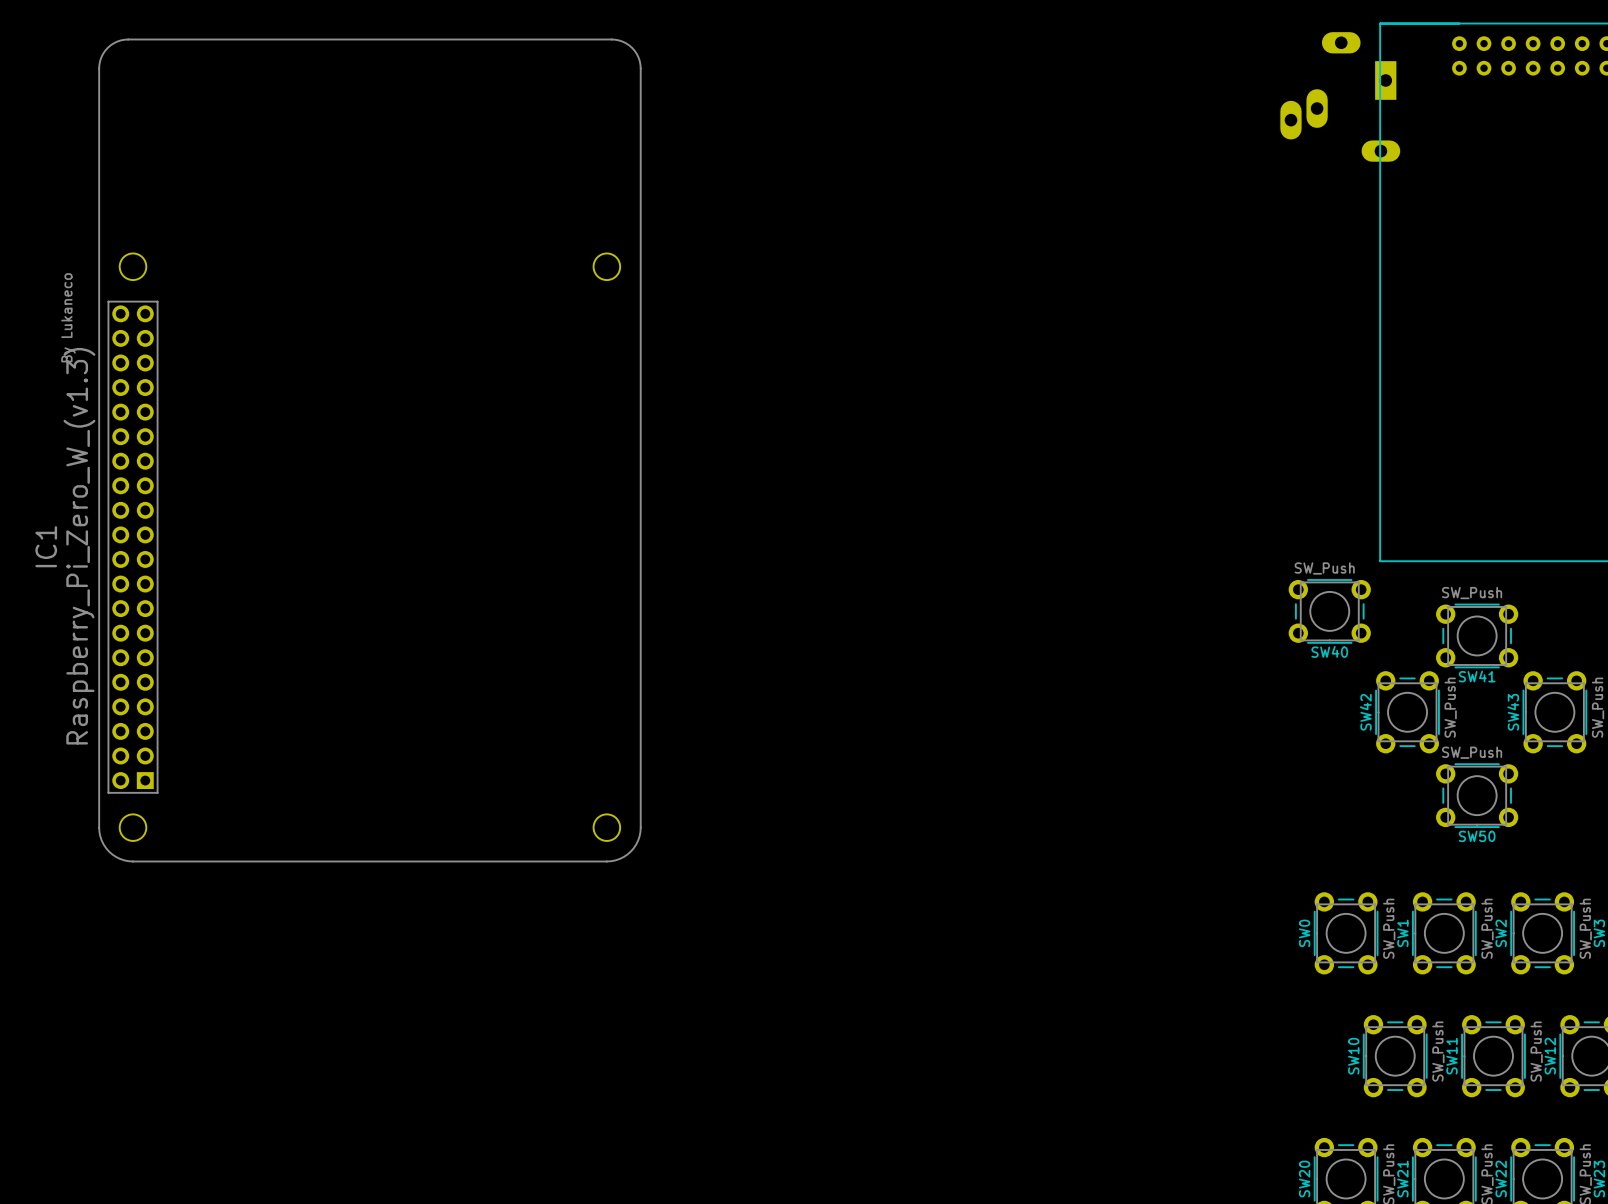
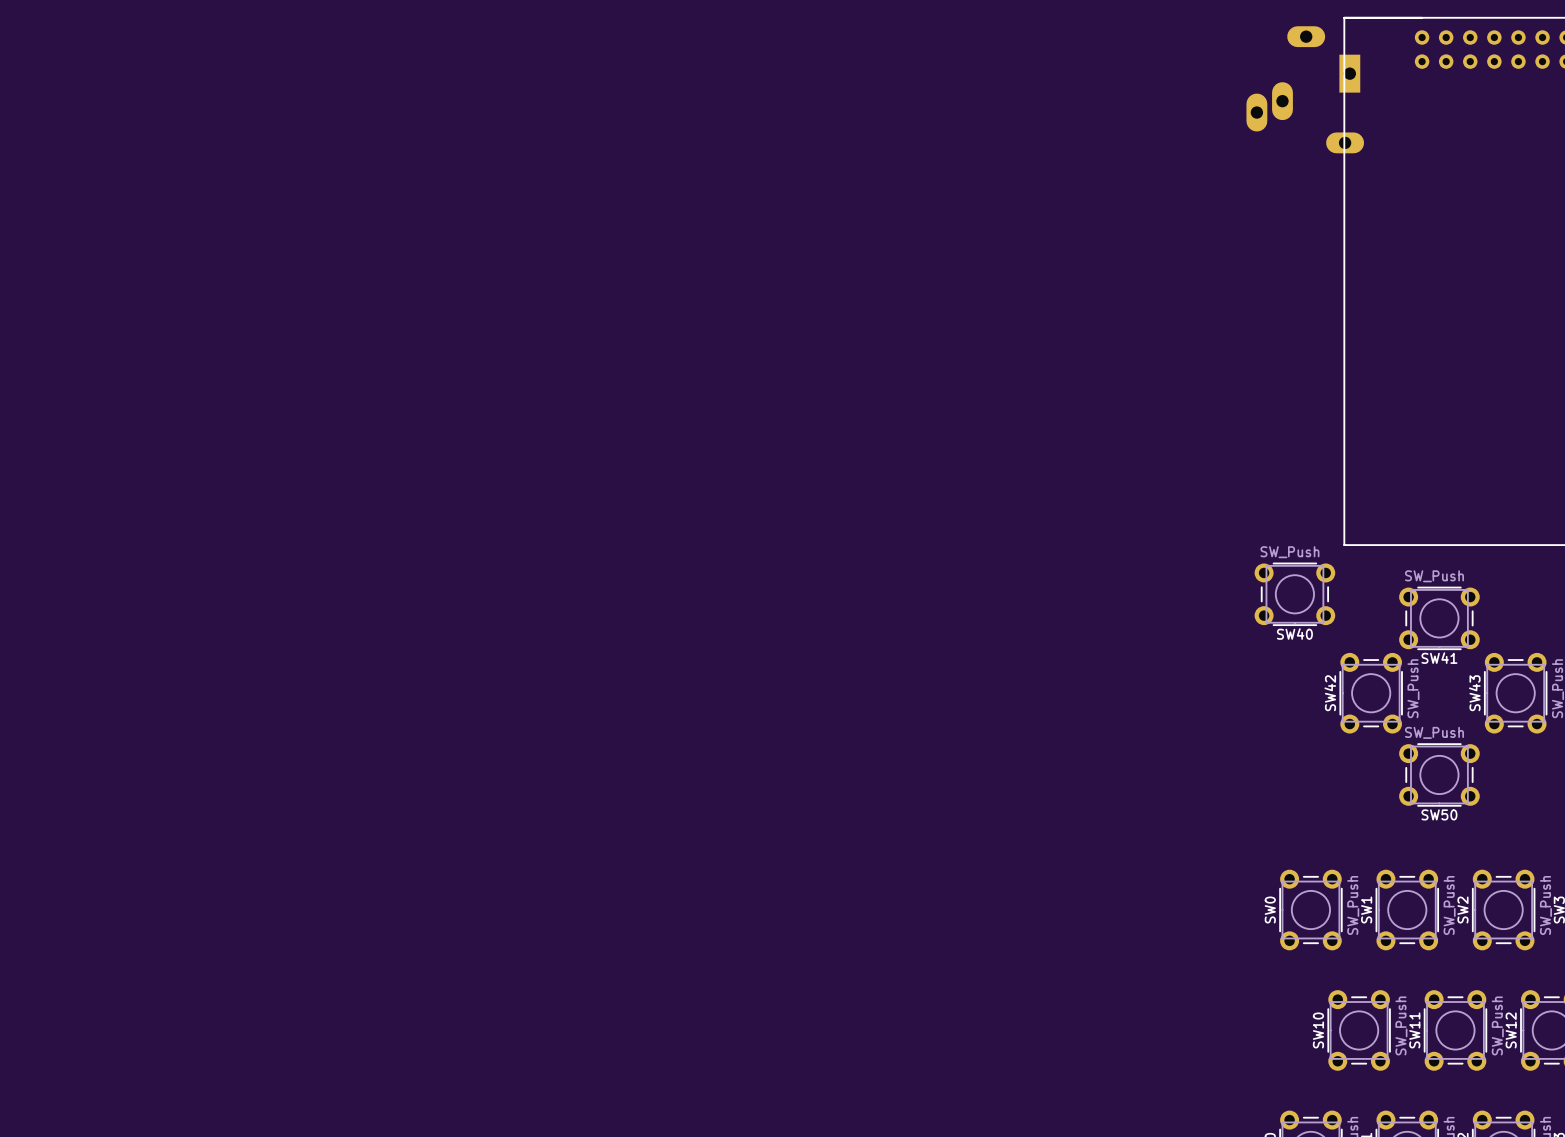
IC1: Raspberry_Pi_Zero_W_(v1.3) (369, 450) -> none

